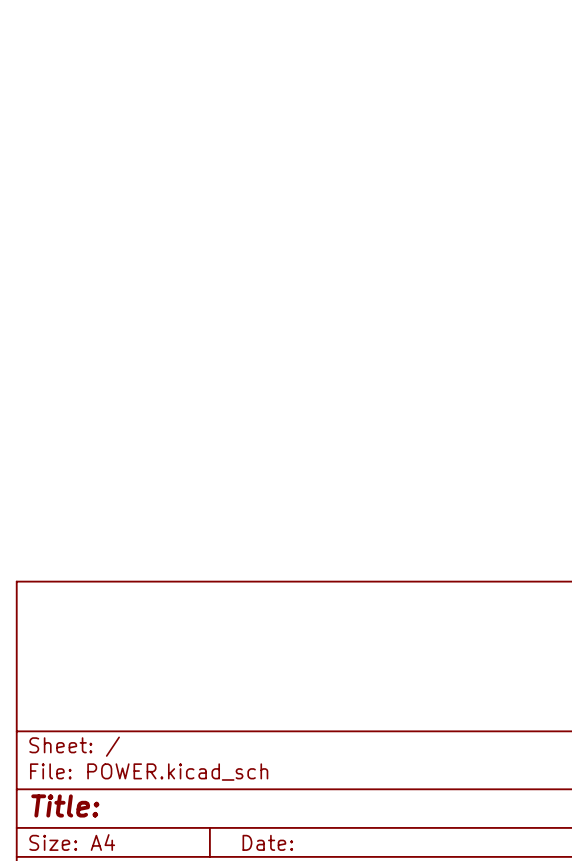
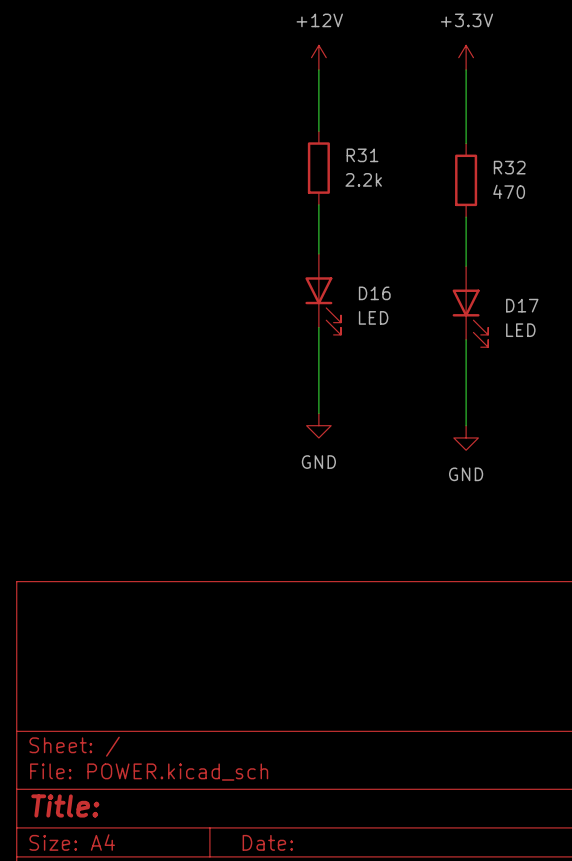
power symbol: none -> +12V (318, 57)
power symbol: none -> +3.3V (466, 57)
wire: none -> (318, 69) (318, 131)
wire: none -> (466, 69) (466, 143)
R31: none -> 2.2k (318, 168)
R32: none -> 470 (466, 180)
wire: none -> (318, 204) (318, 253)
wire: none -> (466, 217) (466, 266)
D16: none -> LED (323, 294)
D17: none -> LED (470, 306)
wire: none -> (318, 327) (318, 413)
wire: none -> (466, 339) (466, 425)
power symbol: none -> GND (318, 425)
power symbol: none -> GND (466, 437)

